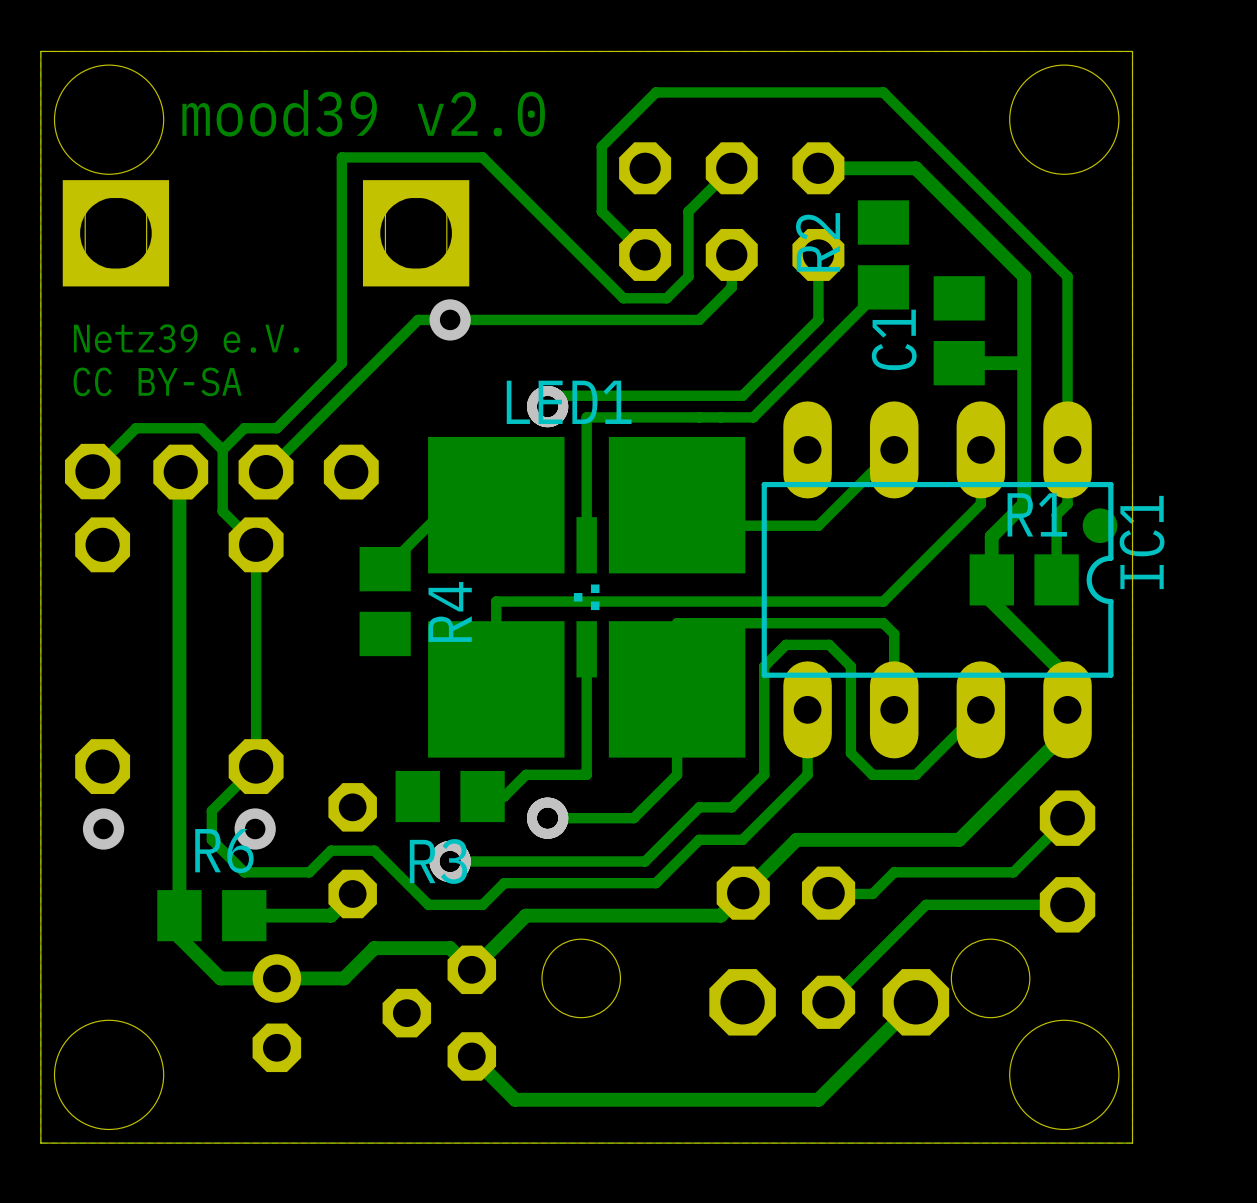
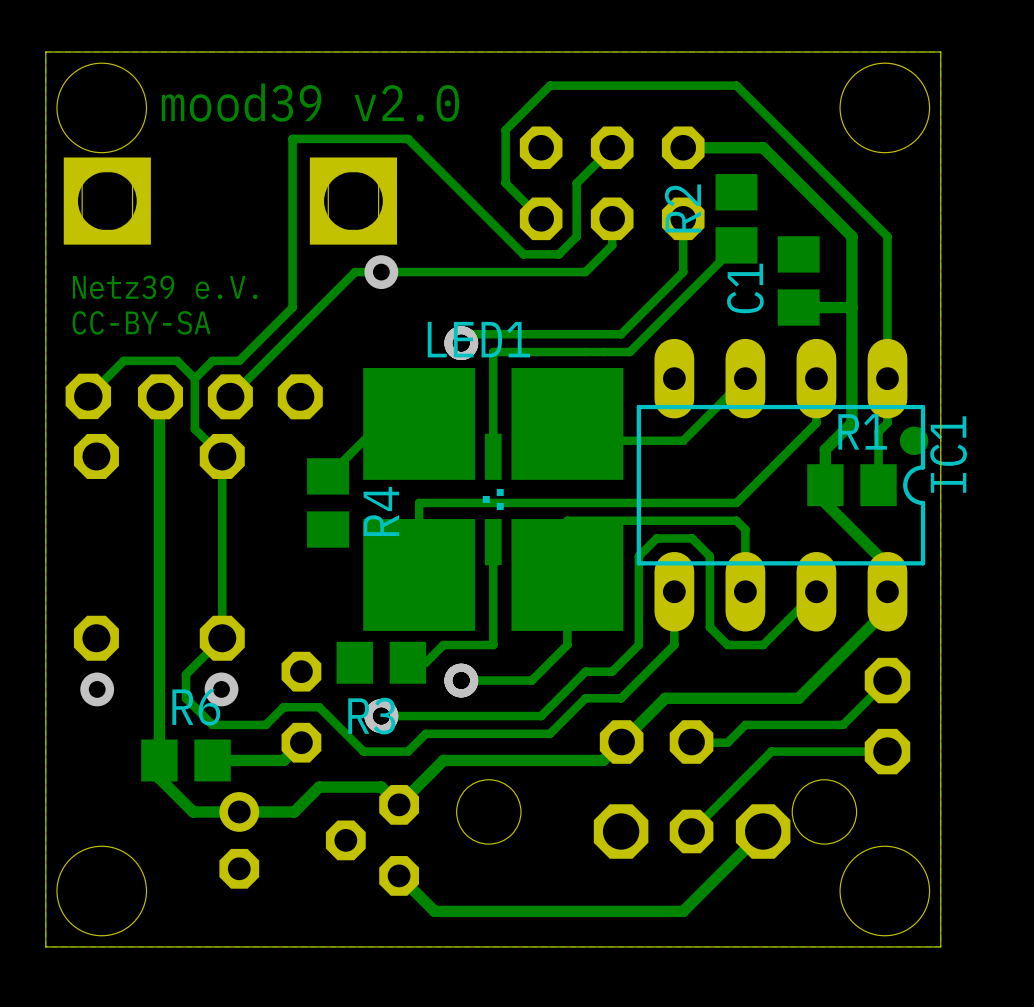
text: CC BY-SA (157, 381) -> CC-BY-SA (141, 322)

